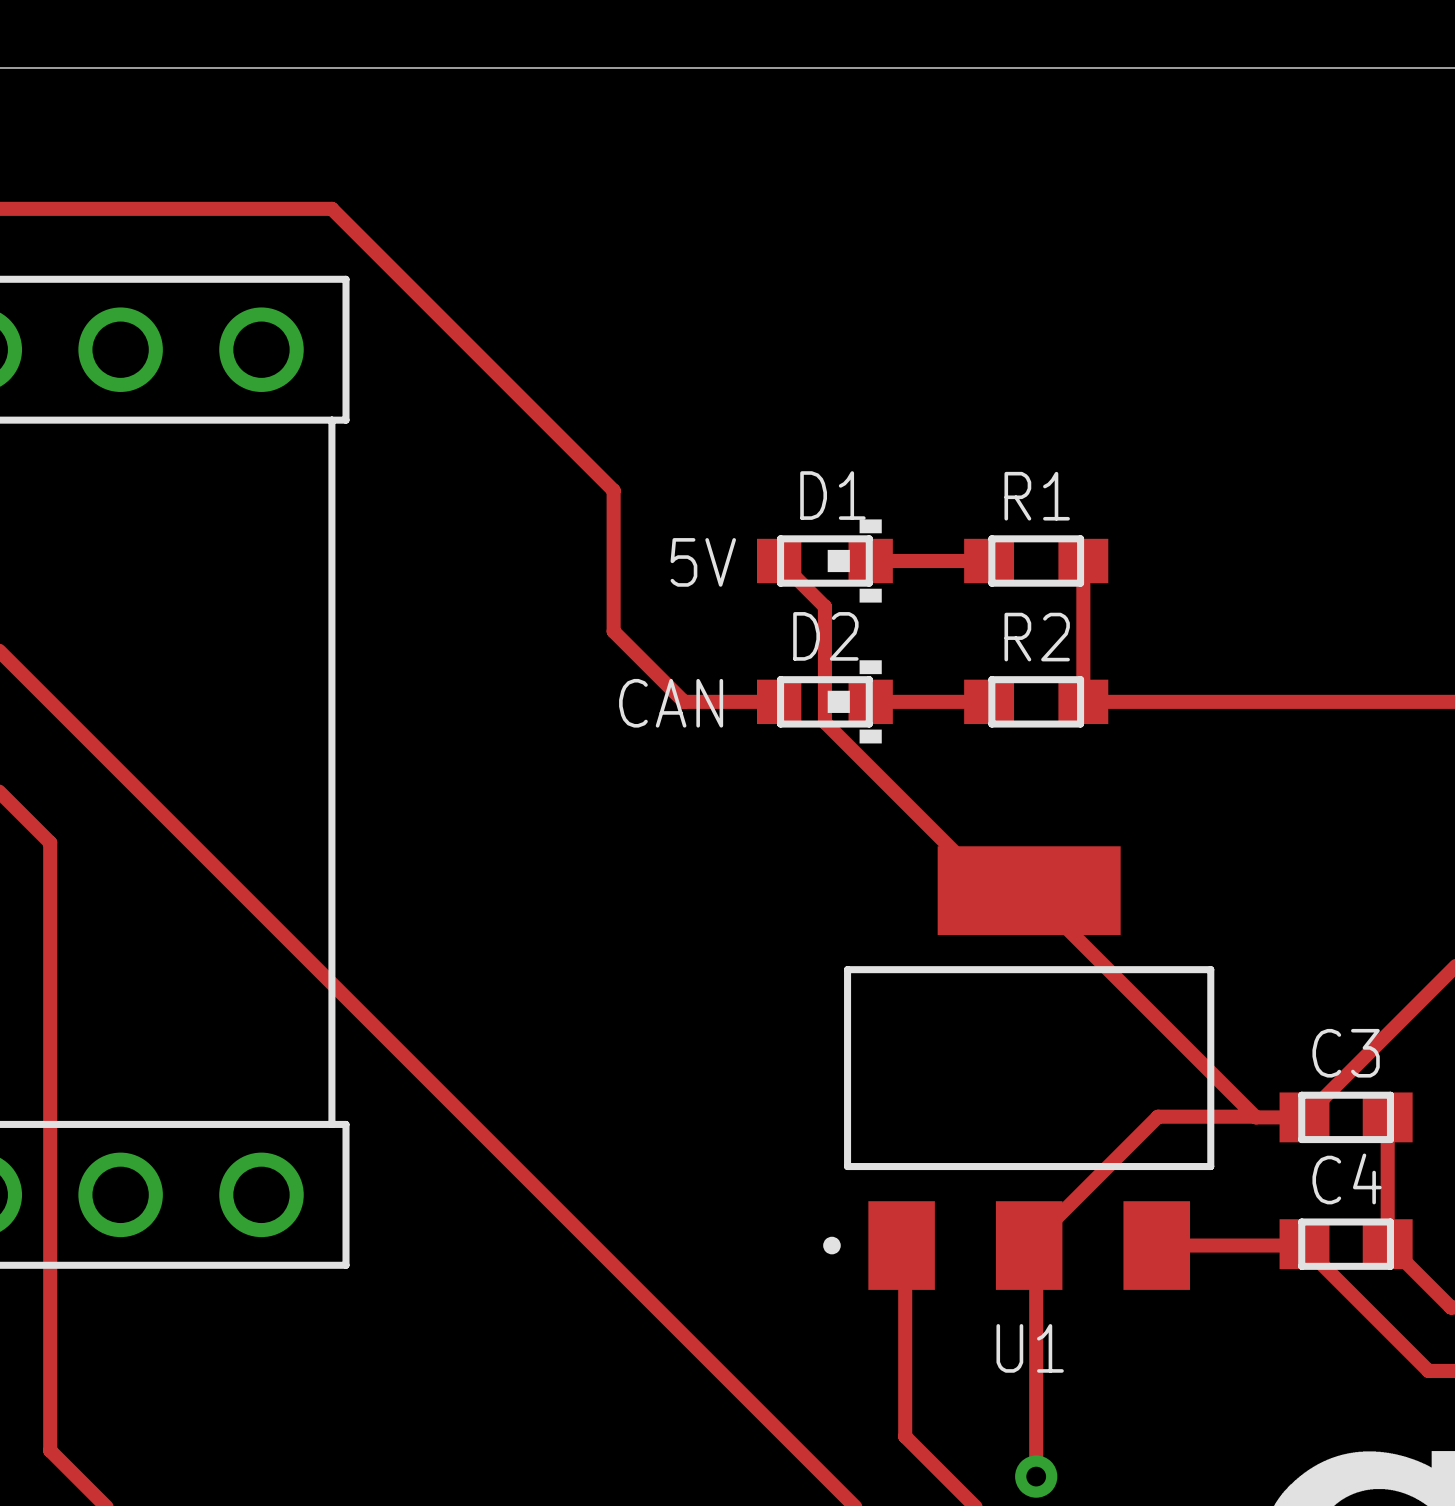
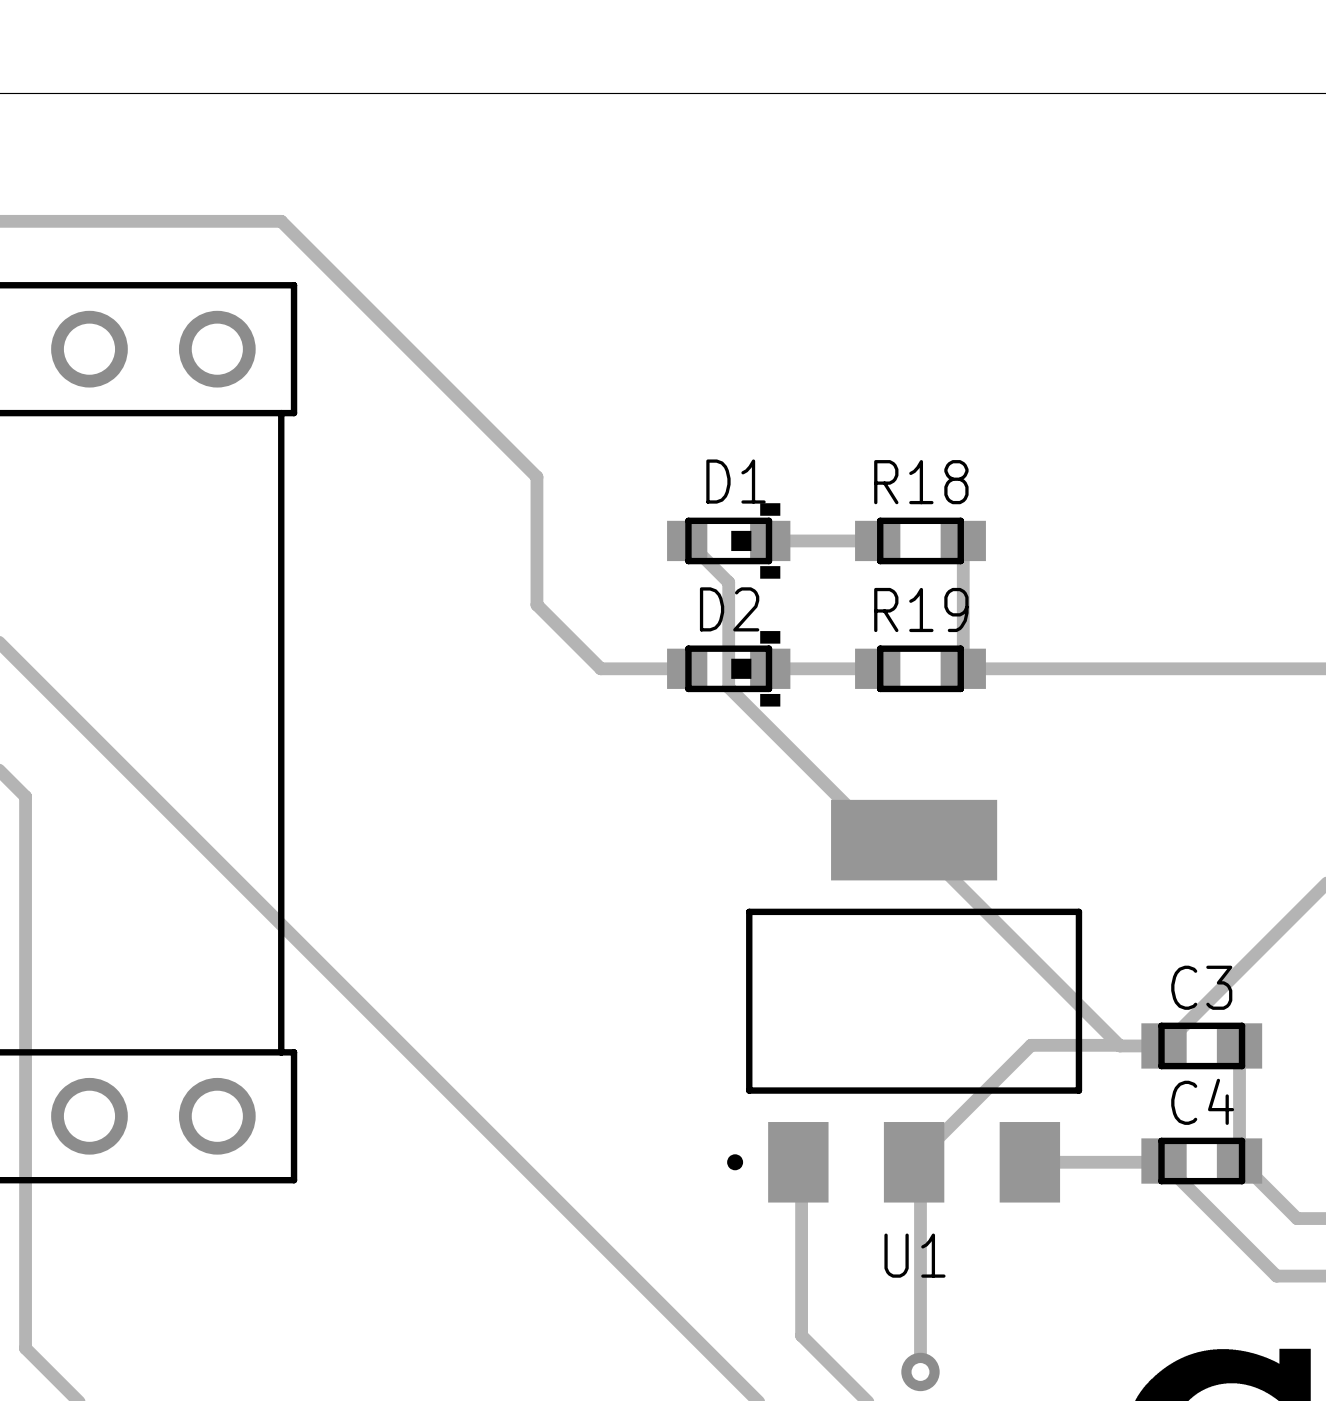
R1 name: R1 (1037, 496) -> R18 (921, 482)
text: 5V (703, 562) -> none
R2 name: R2 (1037, 637) -> R19 (921, 609)
text: CAN (671, 703) -> none

